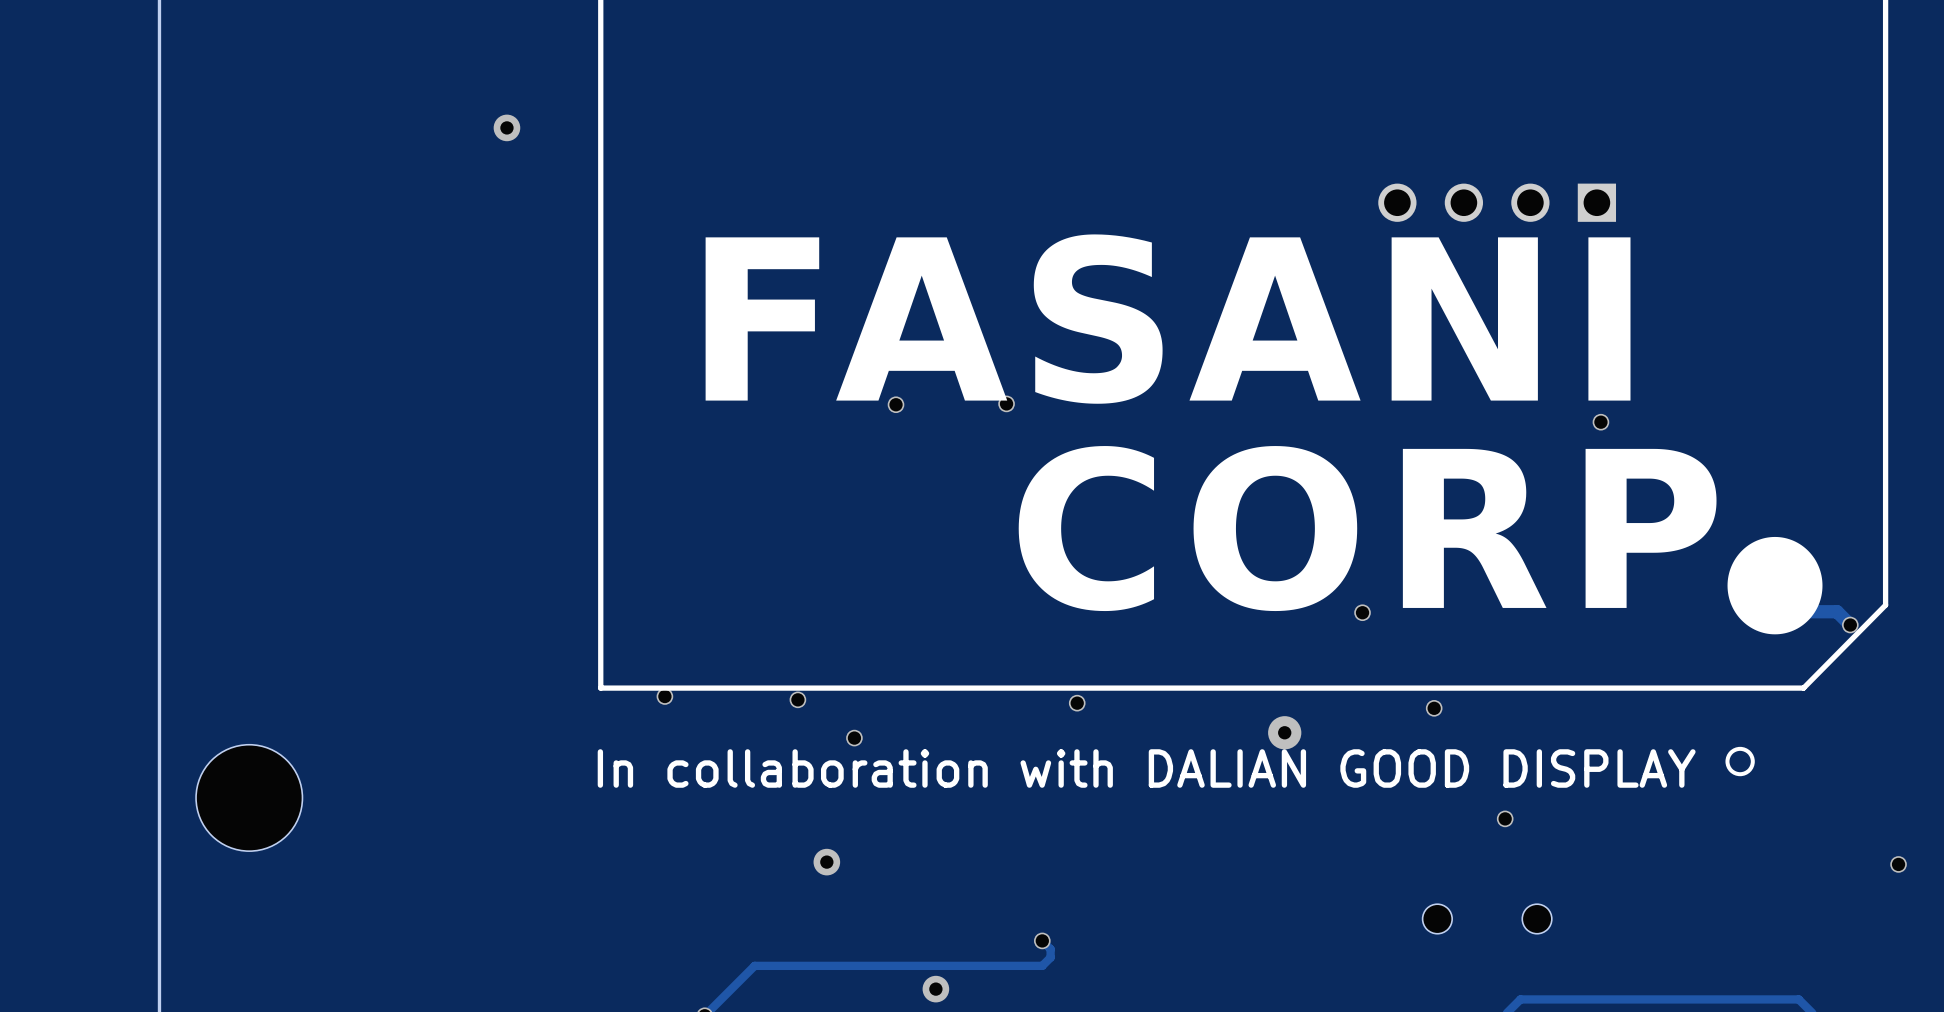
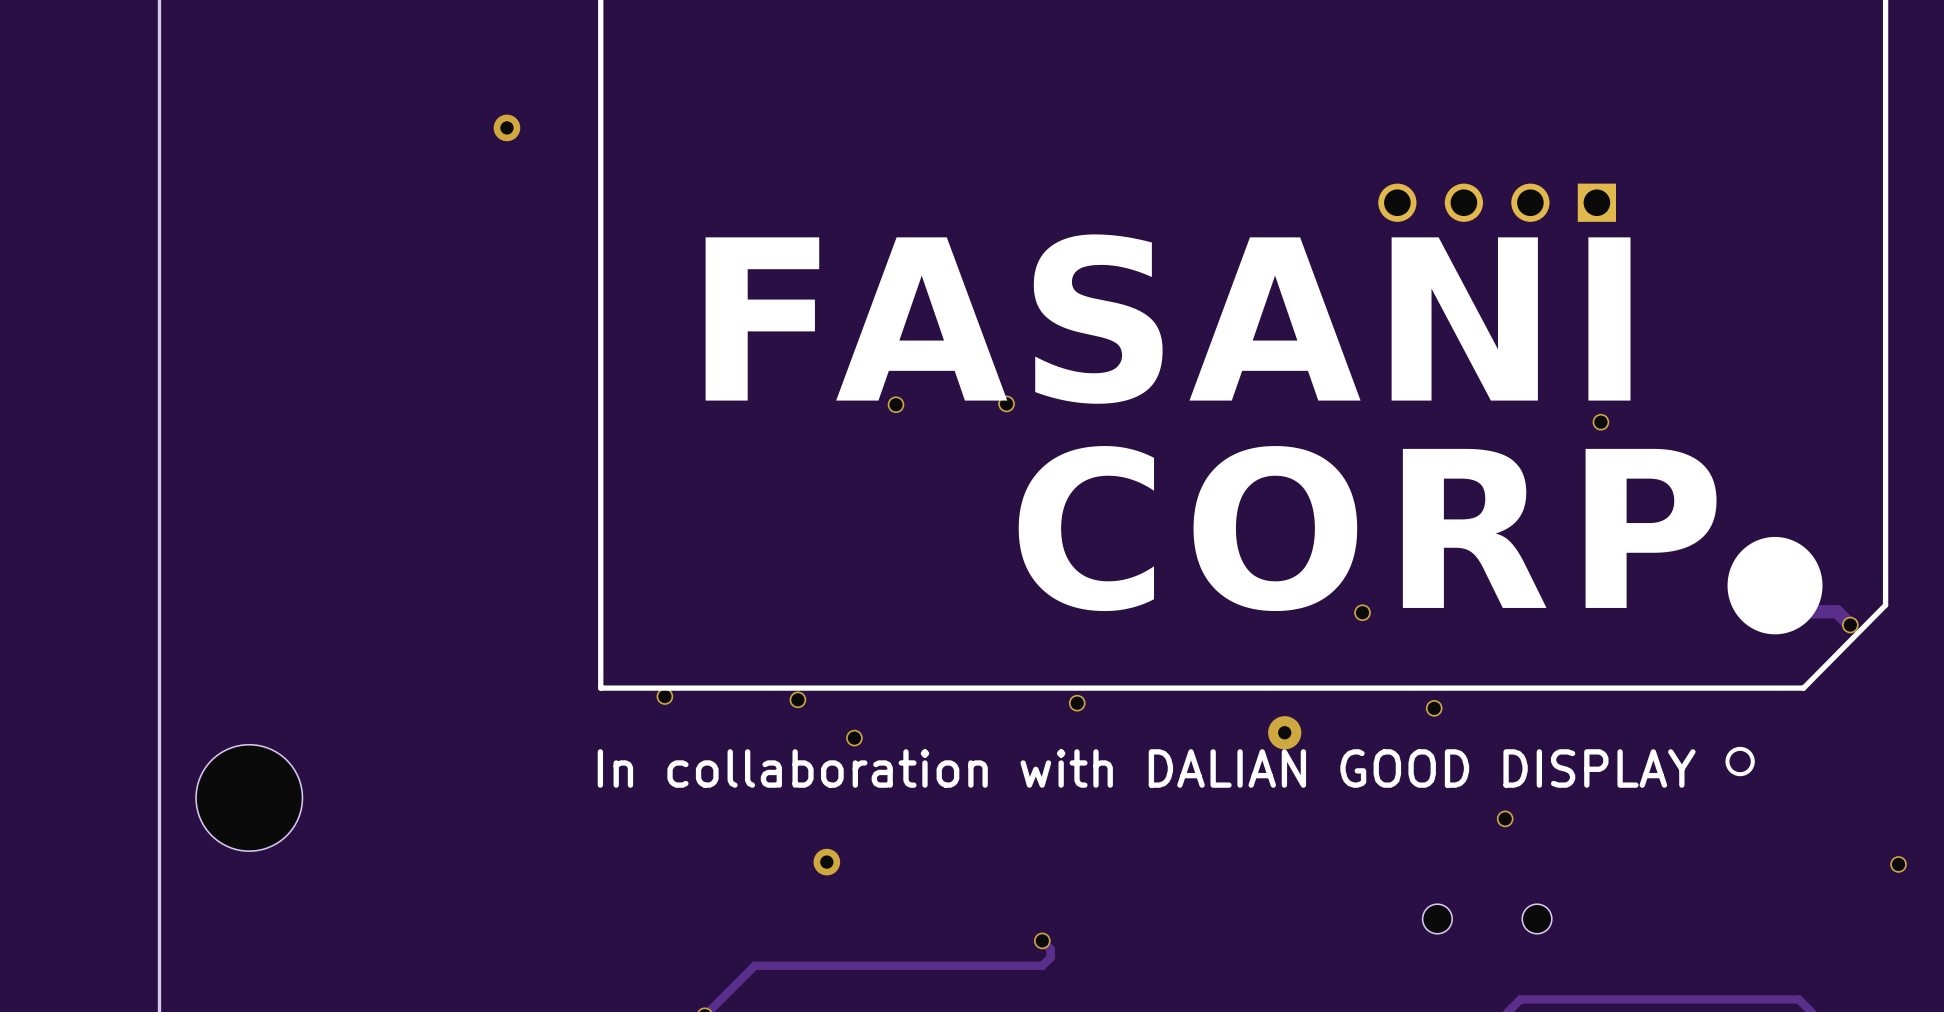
via: (935, 989) -> none

